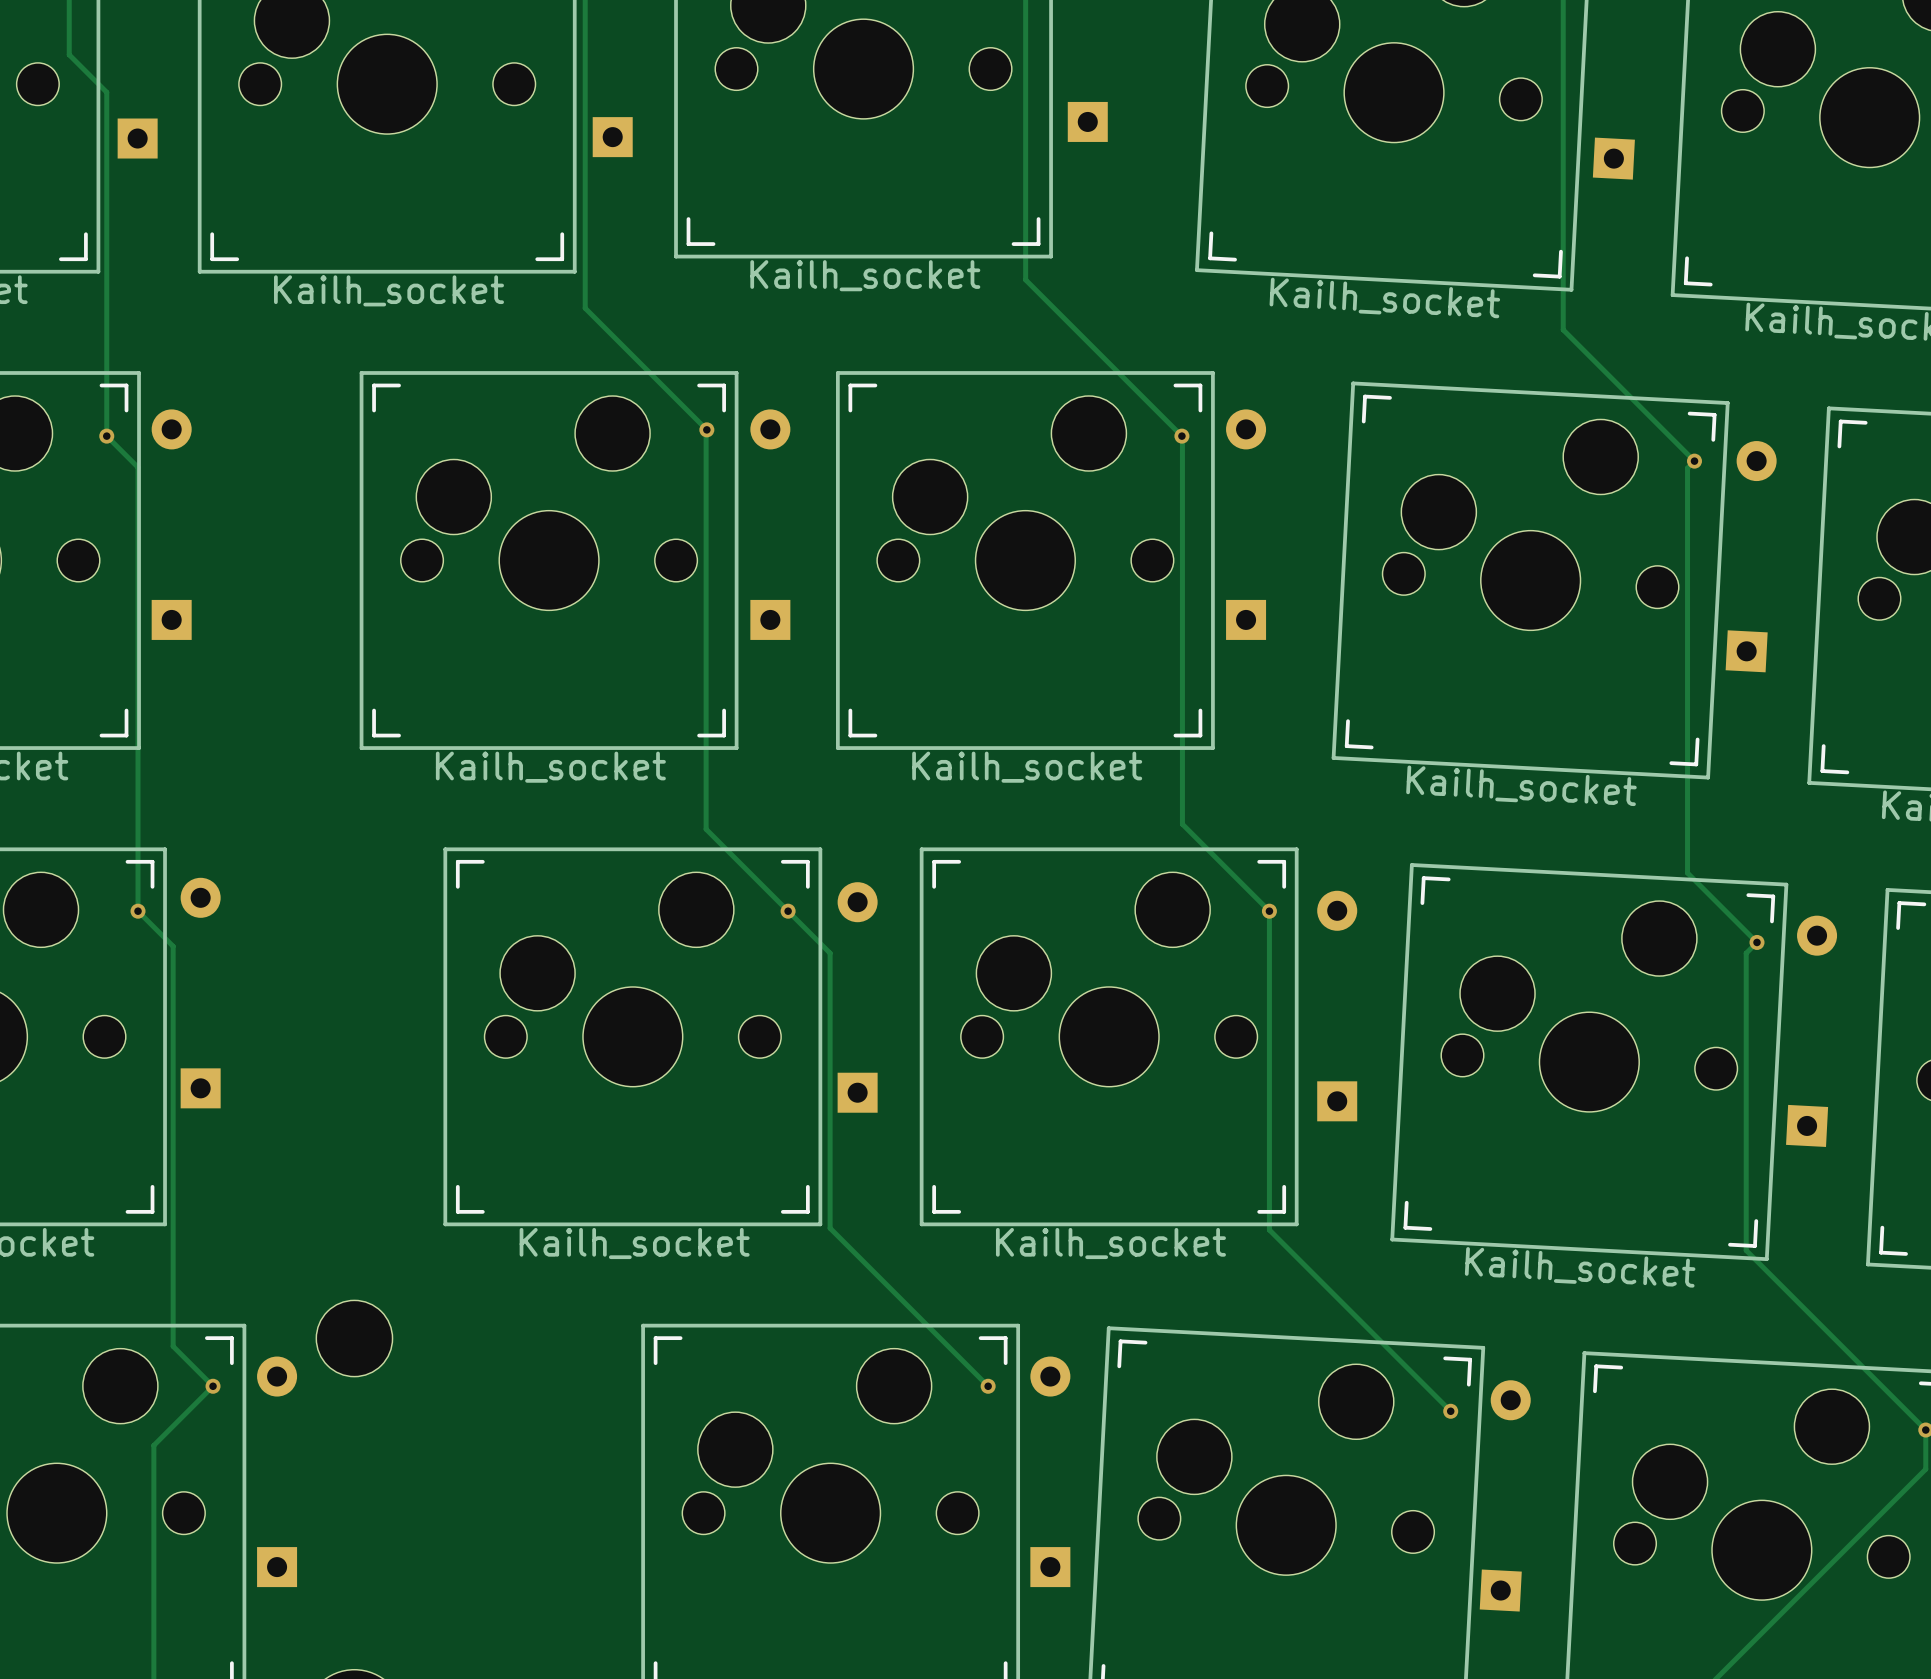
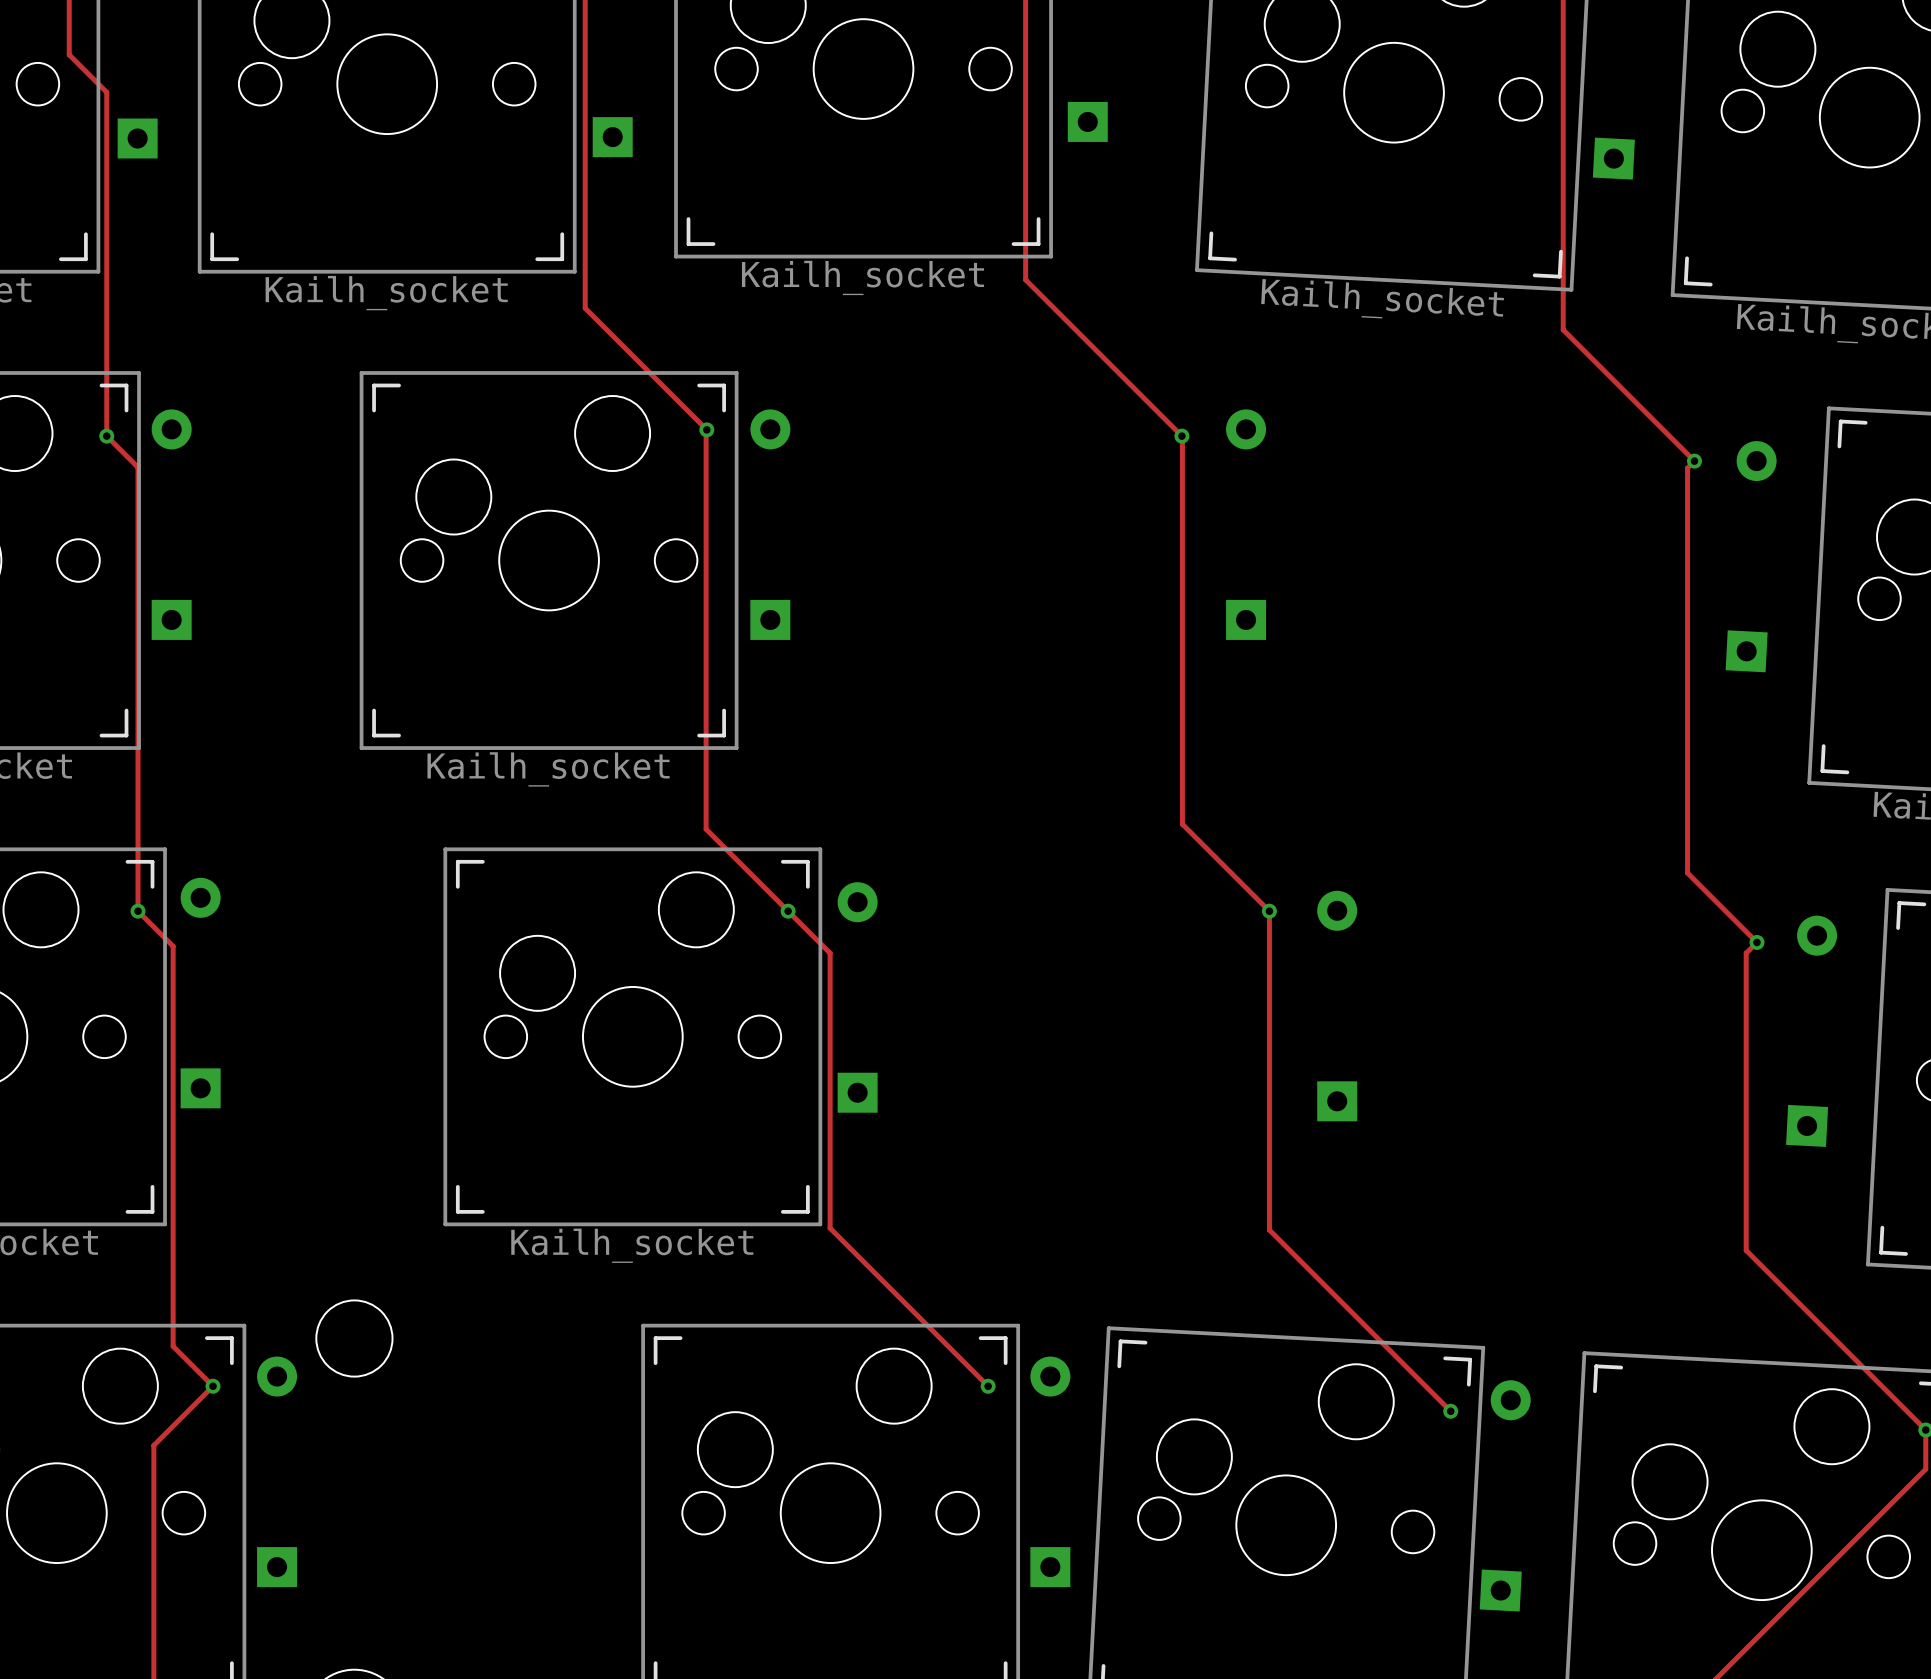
part: Kailh_socket (1025, 560) -> none
part: Kailh_socket (1530, 580) -> none
part: Kailh_socket (1109, 1036) -> none
part: Kailh_socket (1589, 1062) -> none

